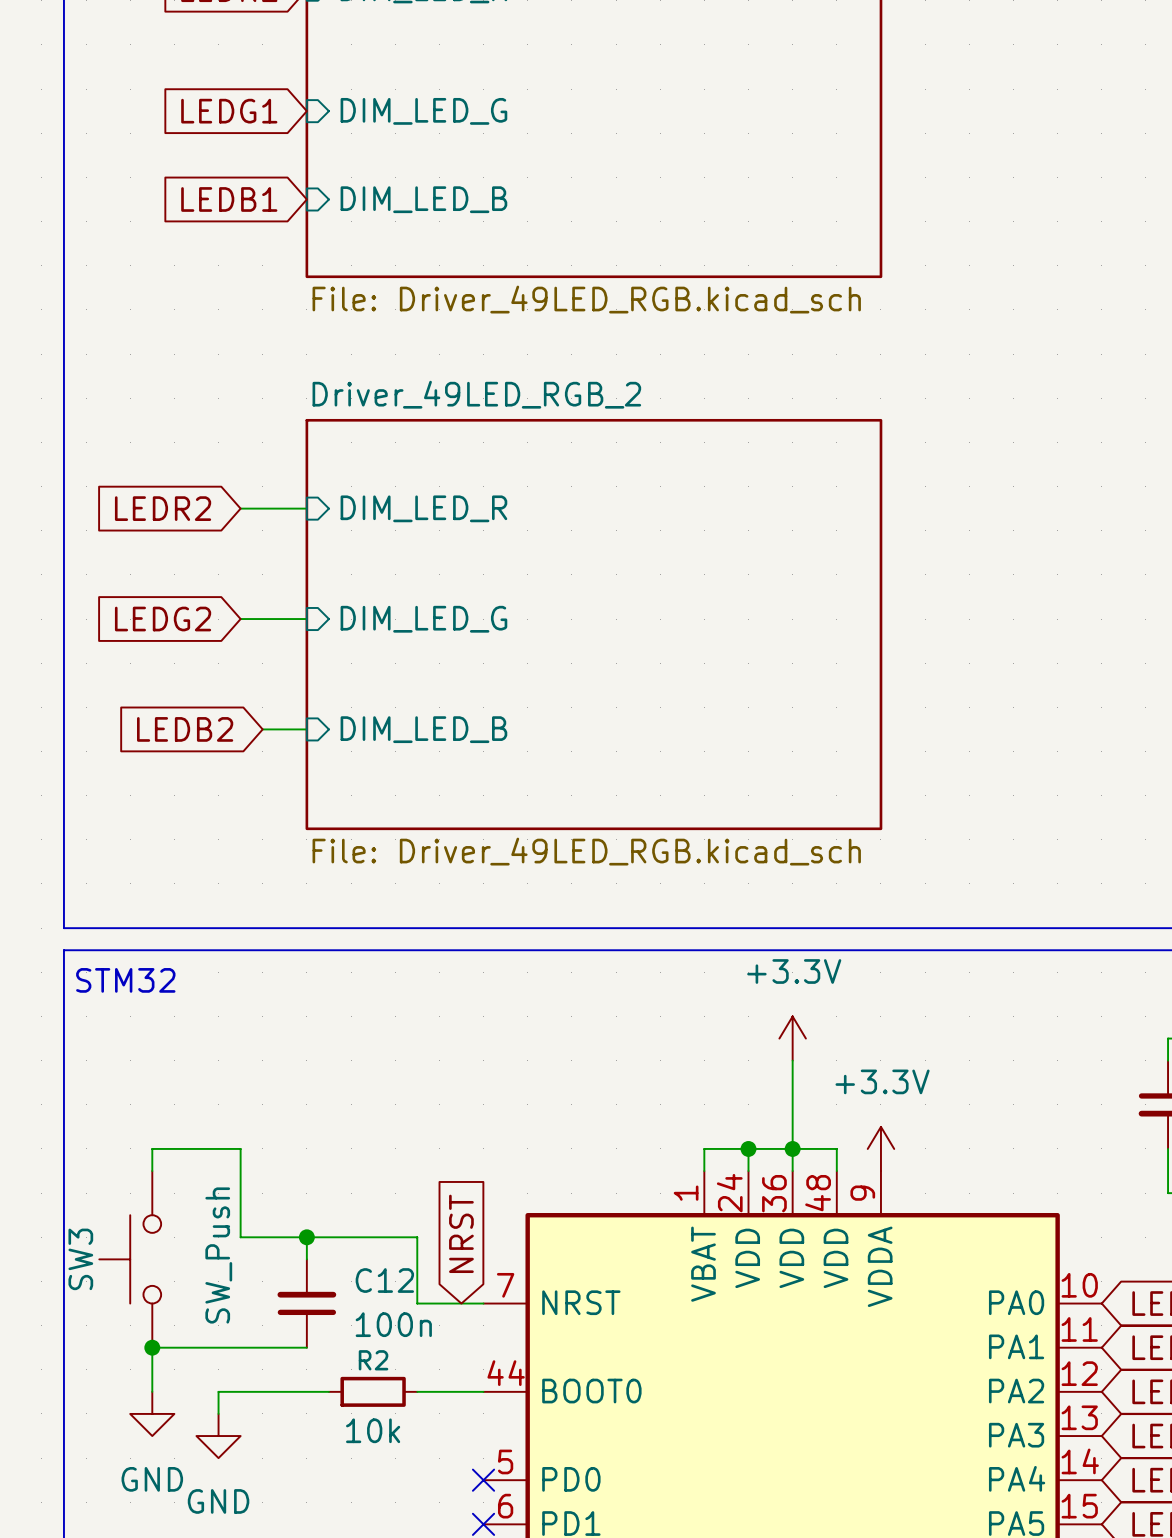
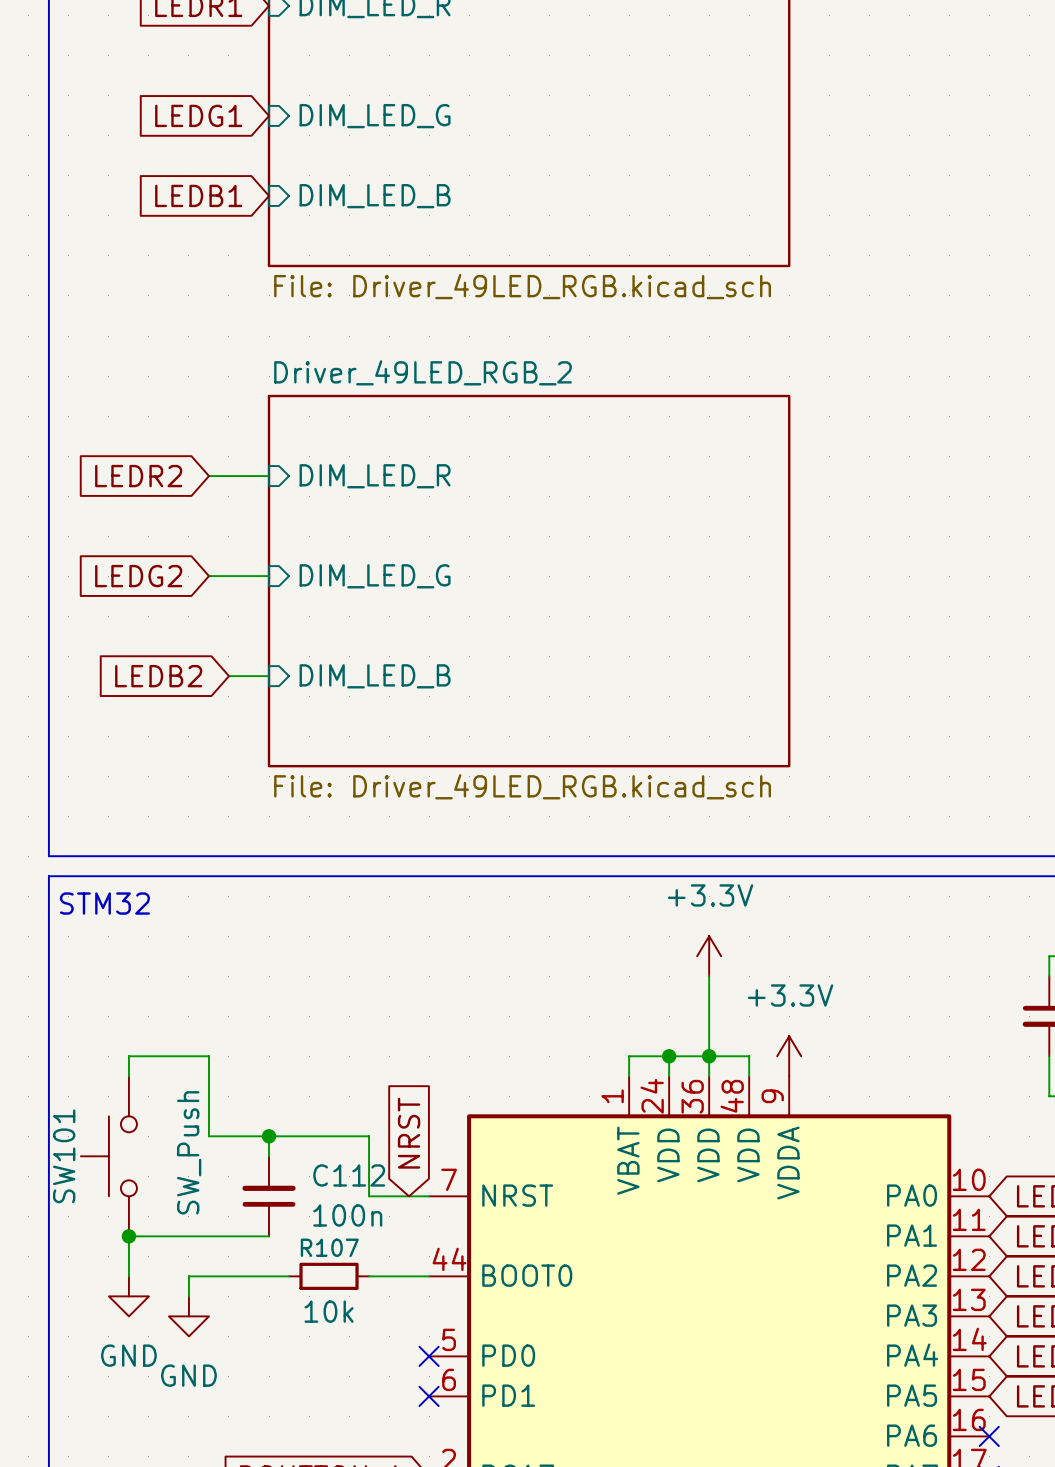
SW3 name: SW3 (80, 1259) -> SW101 (64, 1156)
C12 name: C12 (384, 1280) -> C112 (349, 1175)
R2 name: R2 (373, 1360) -> R107 (329, 1247)

